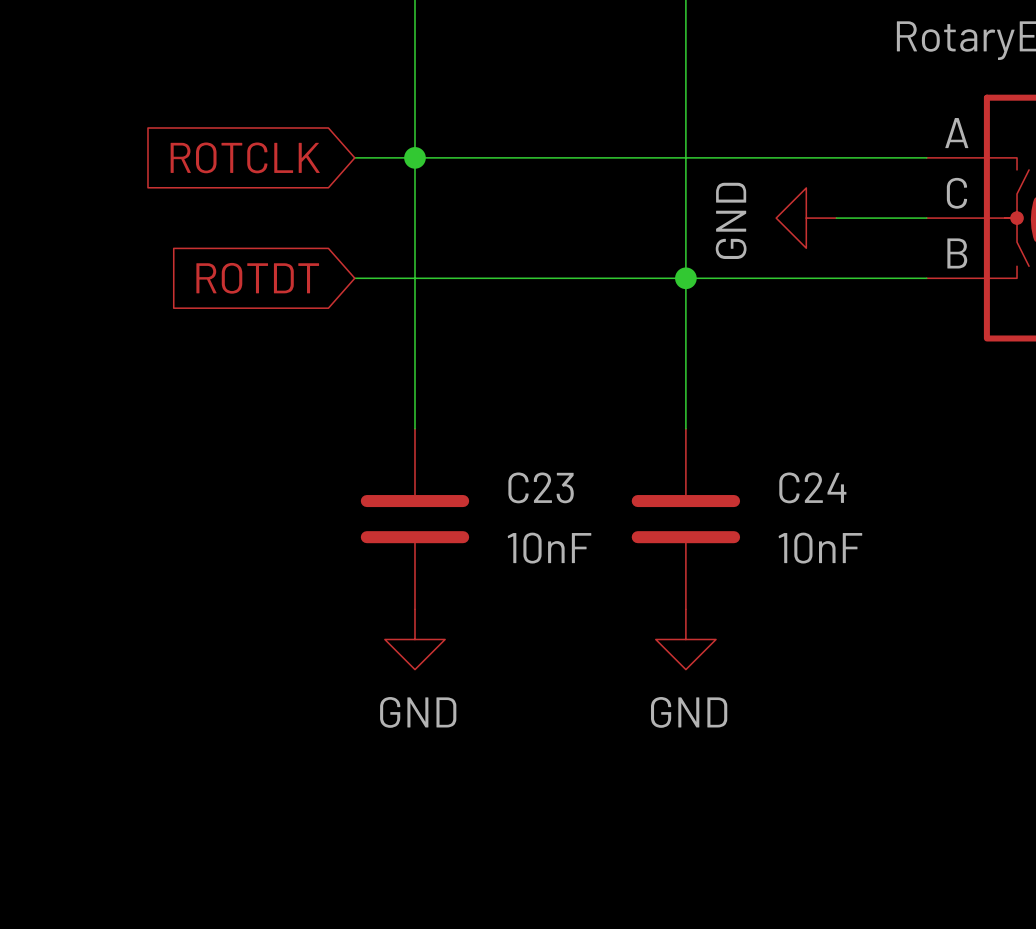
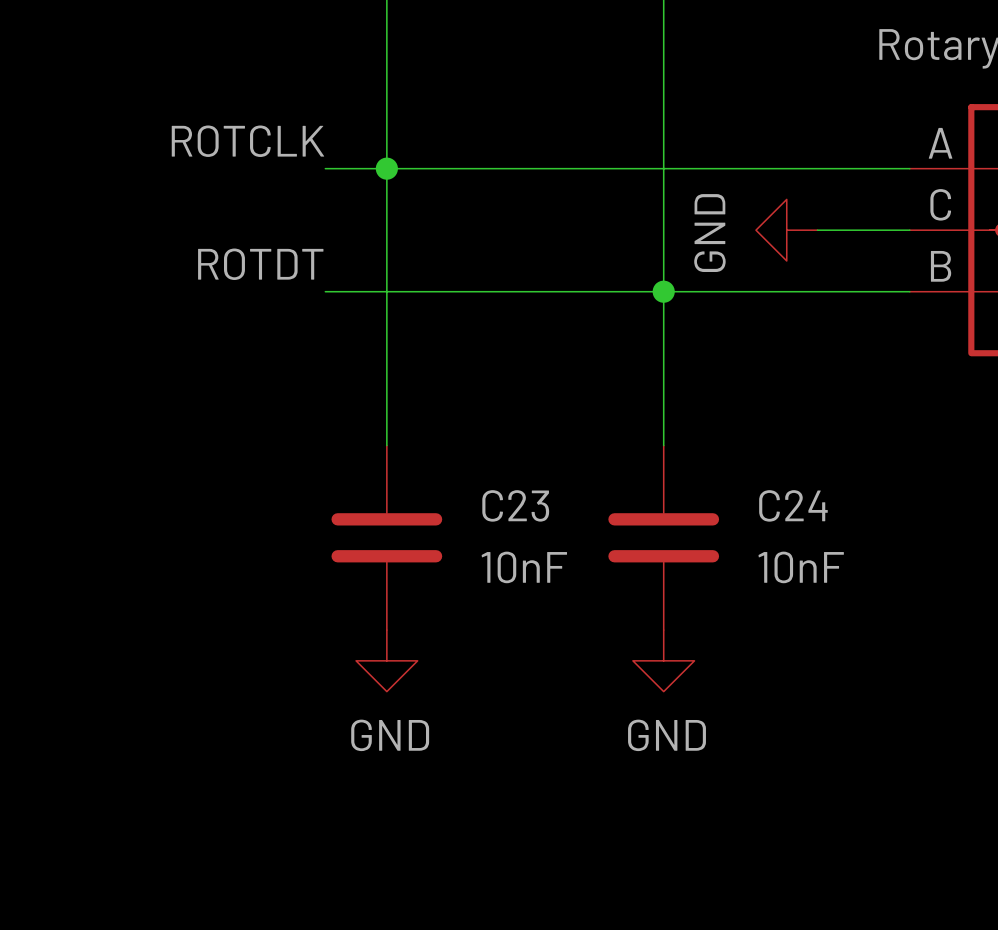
label: none -> ROTCLK (247, 141)
global label: ROTCLK (245, 157) -> none
label: none -> ROTDT (260, 264)
global label: ROTDT (257, 278) -> none

